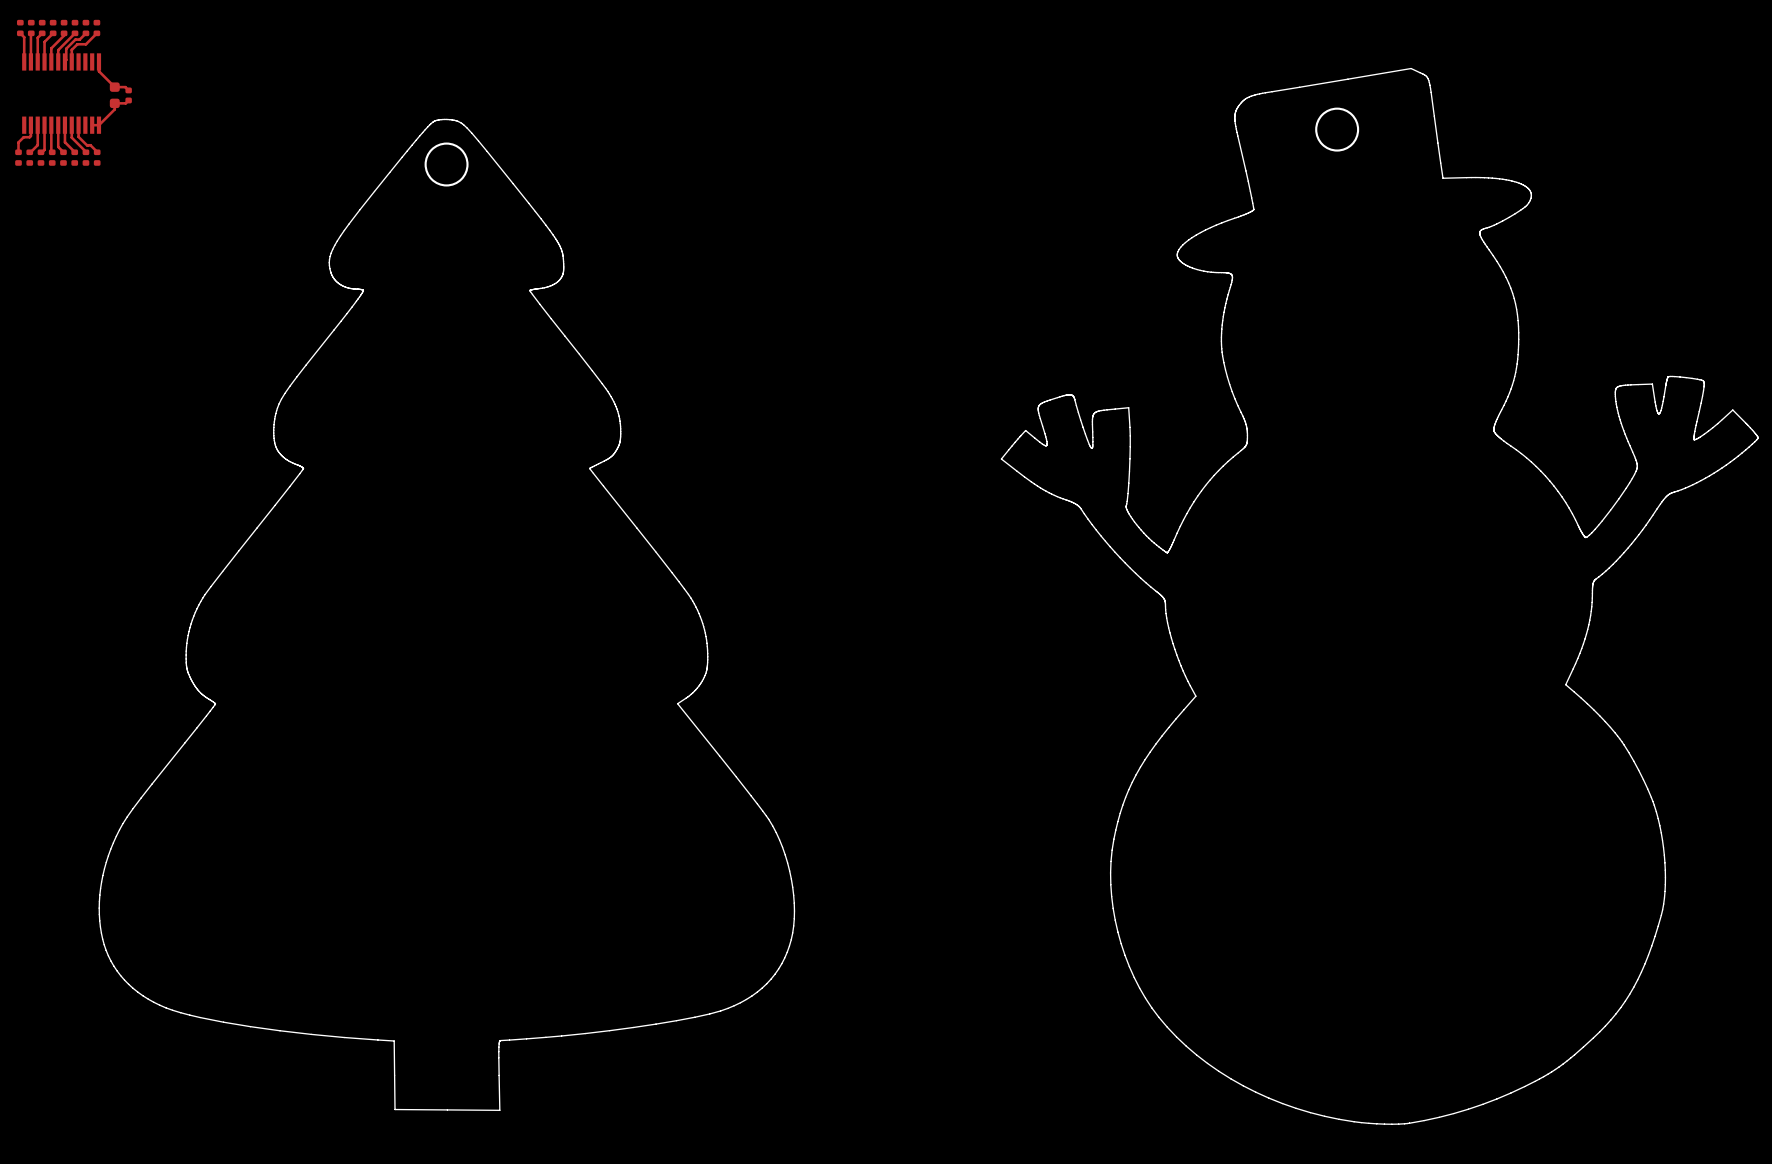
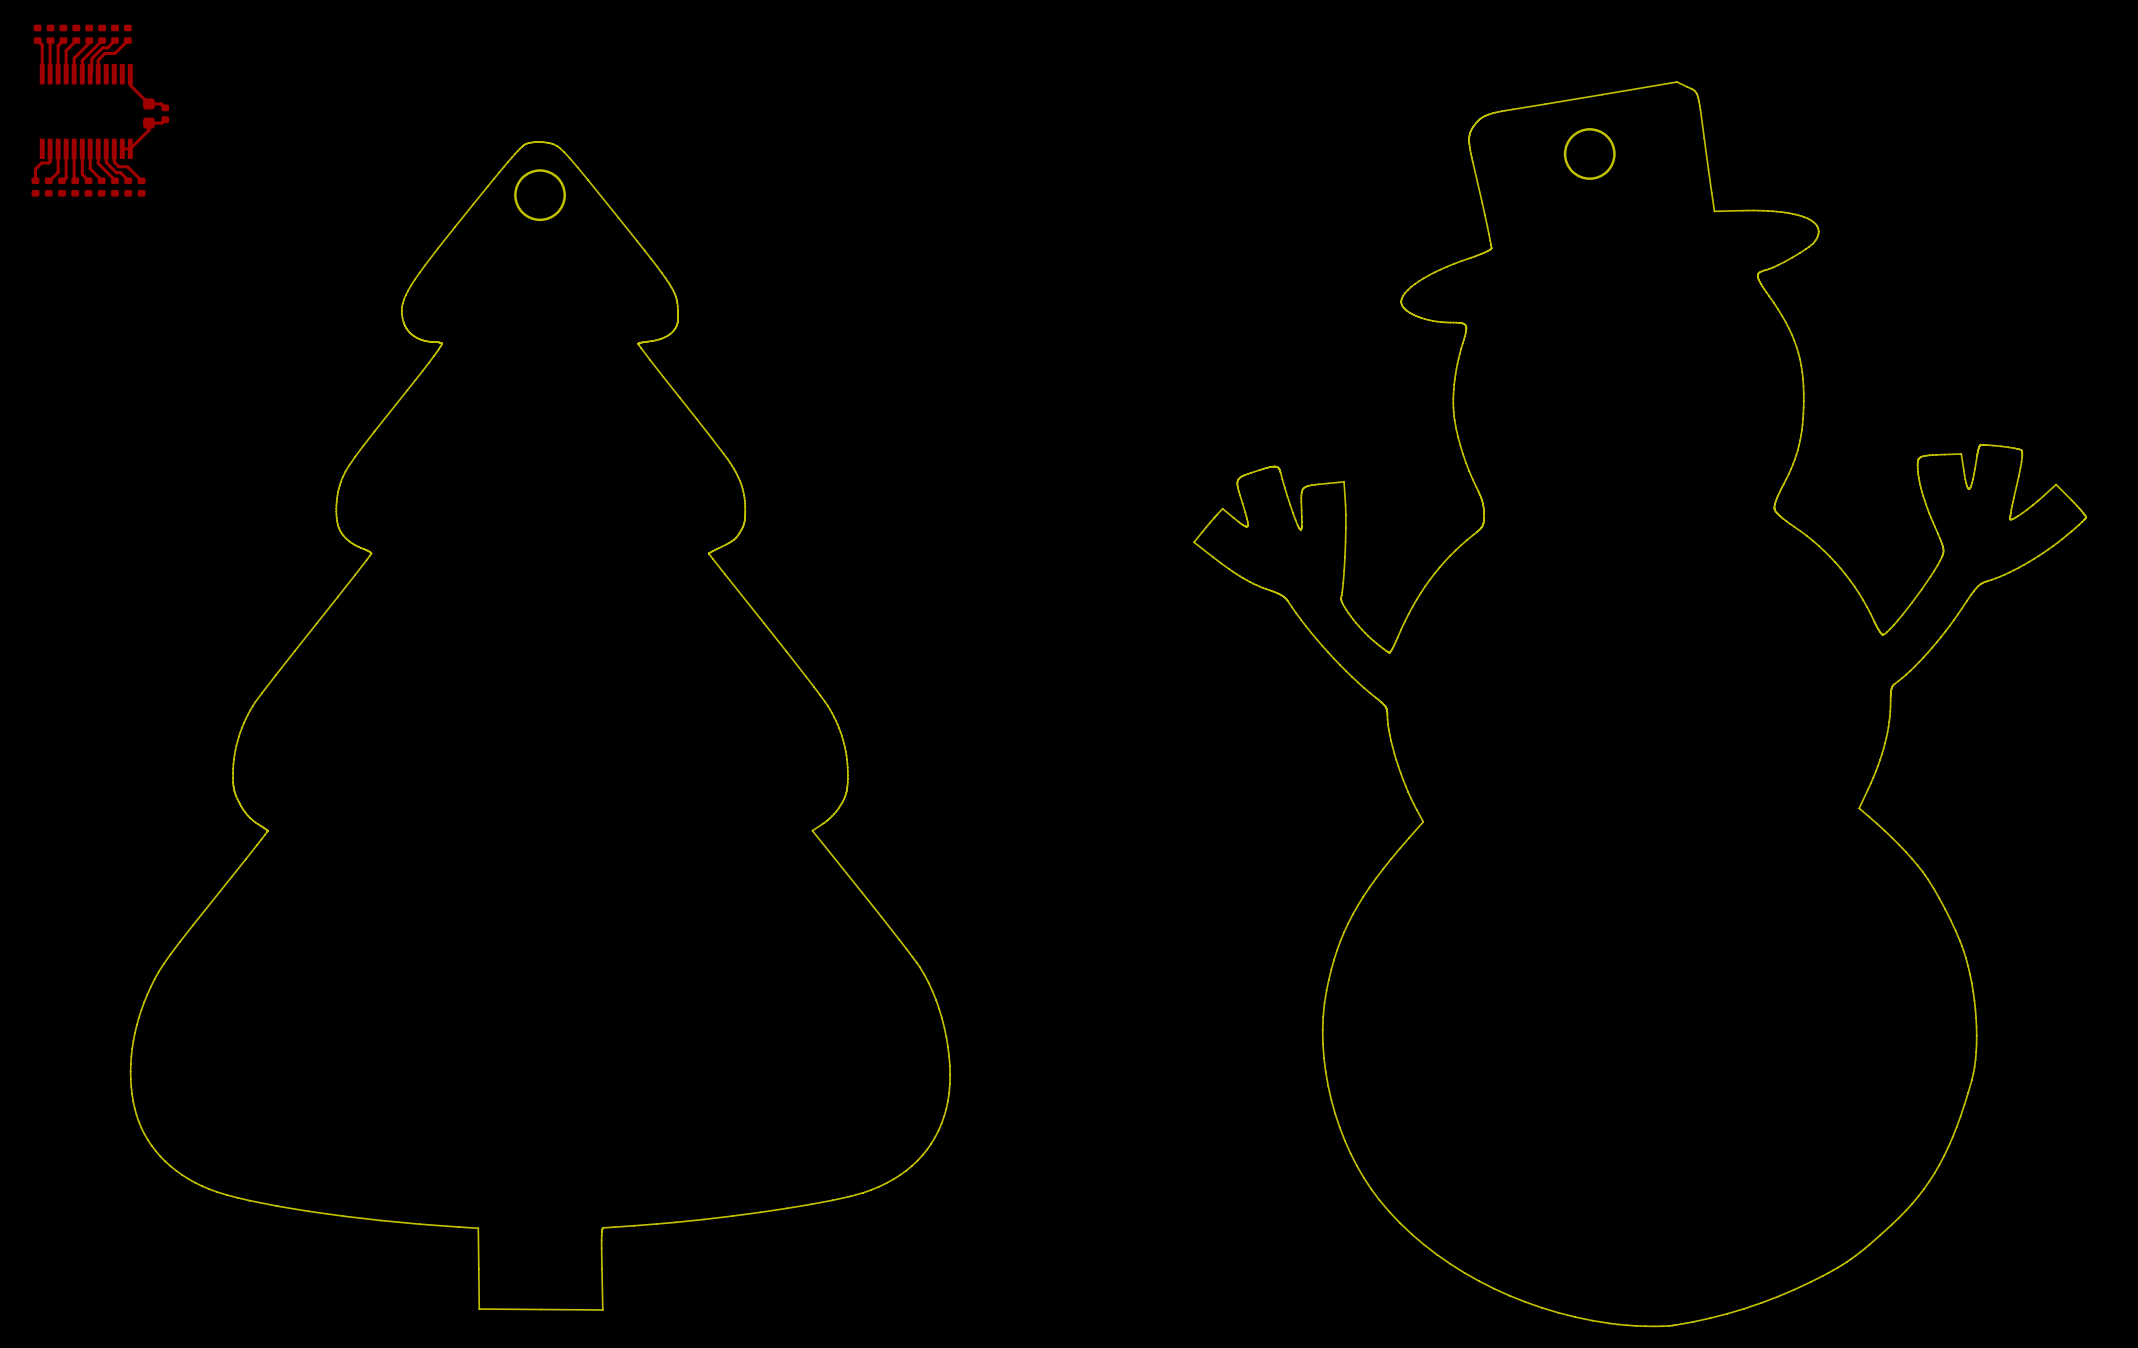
top track: none -> (114, 148) (114, 162) (118, 166) (127, 166) (141, 180)
part: none -> (141, 187)

